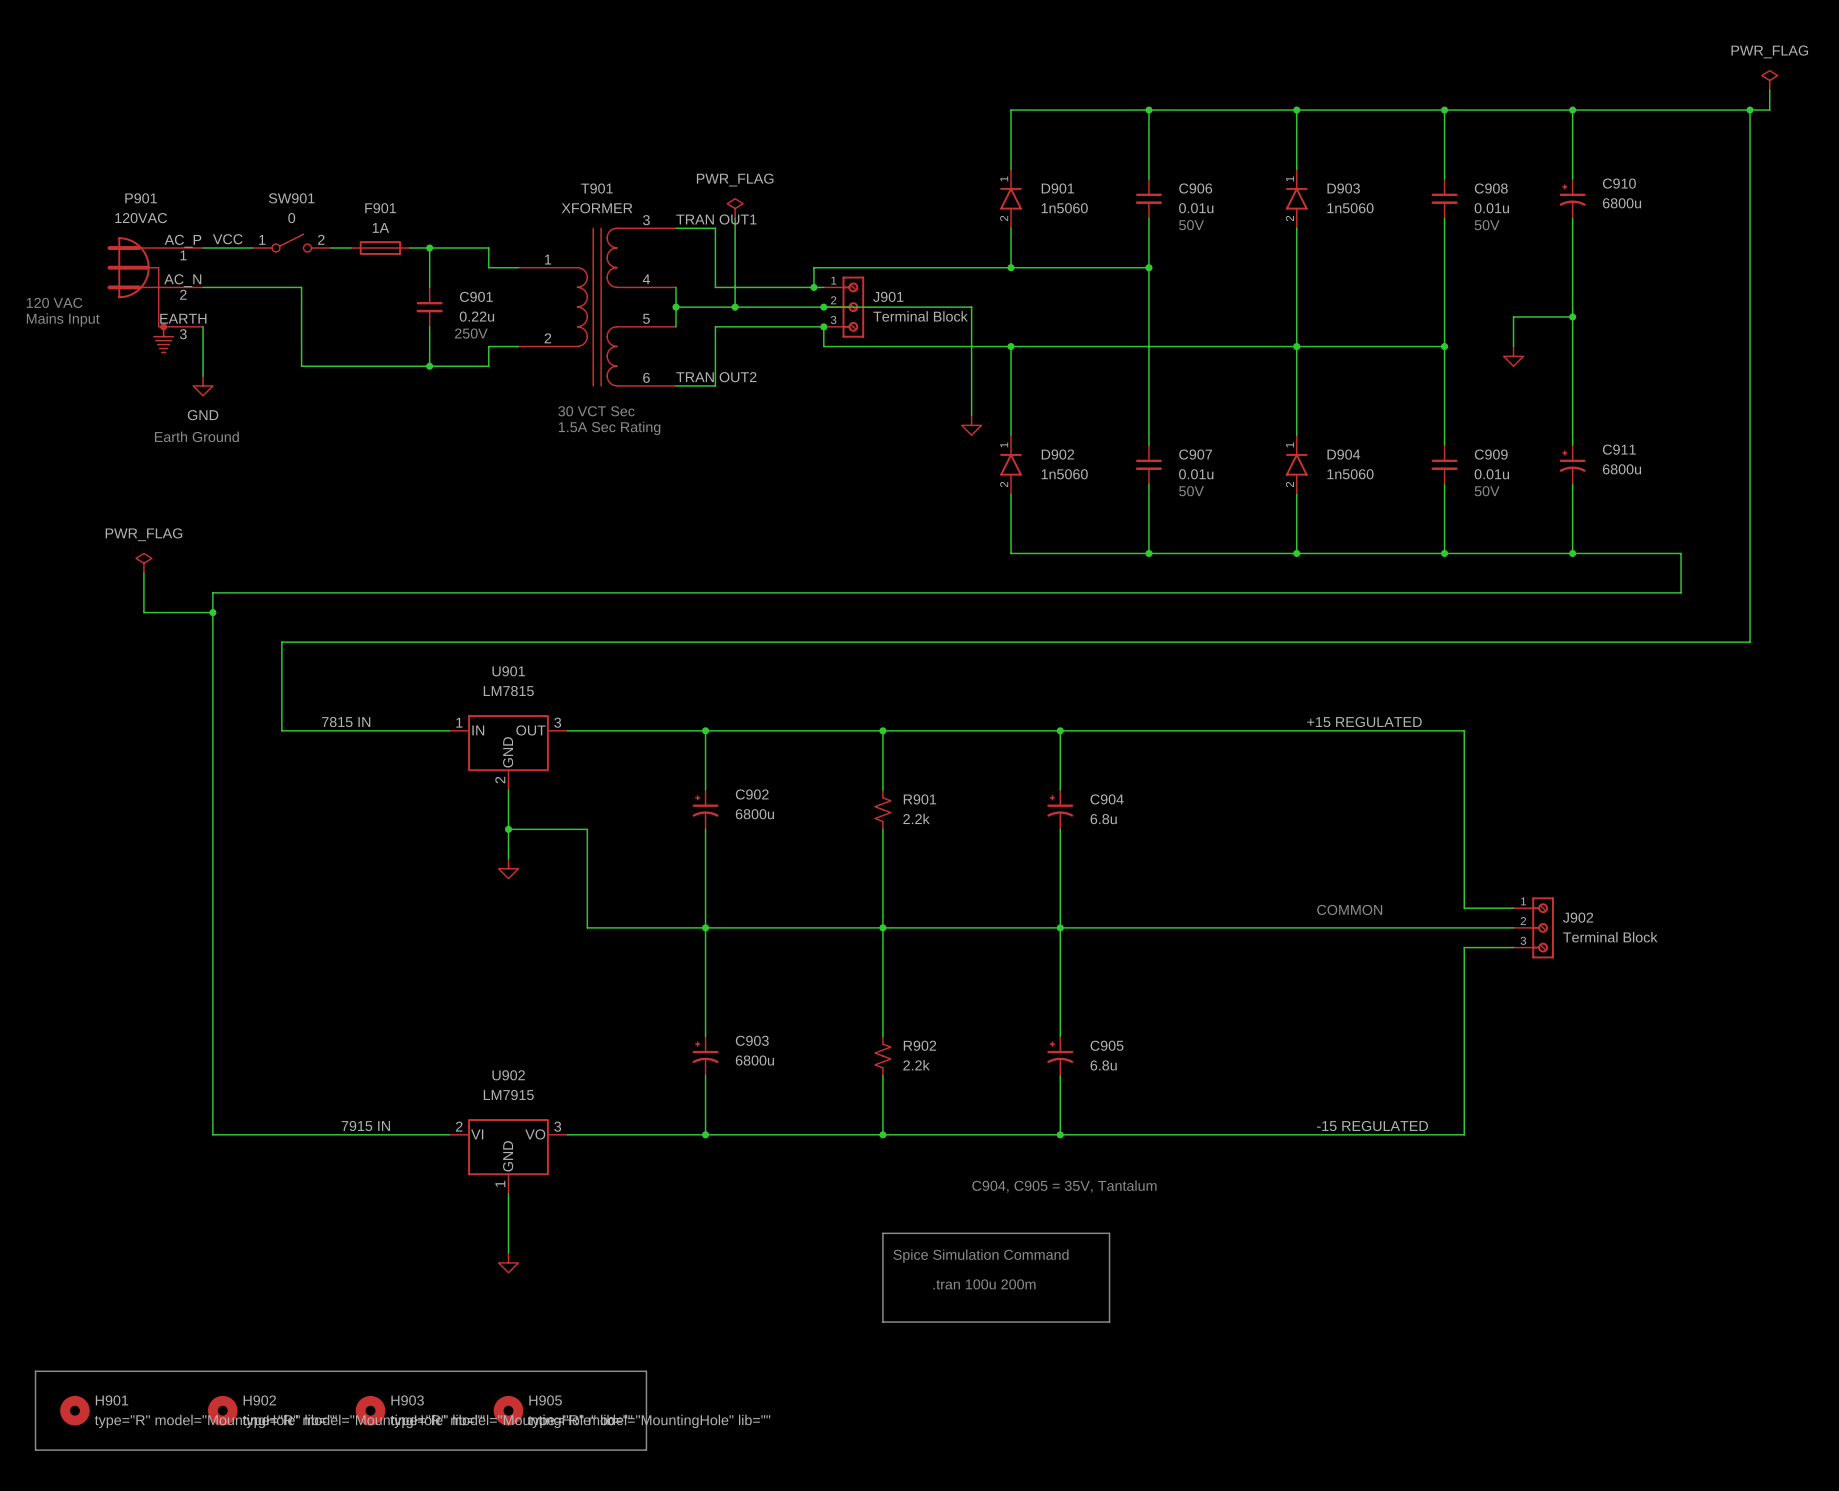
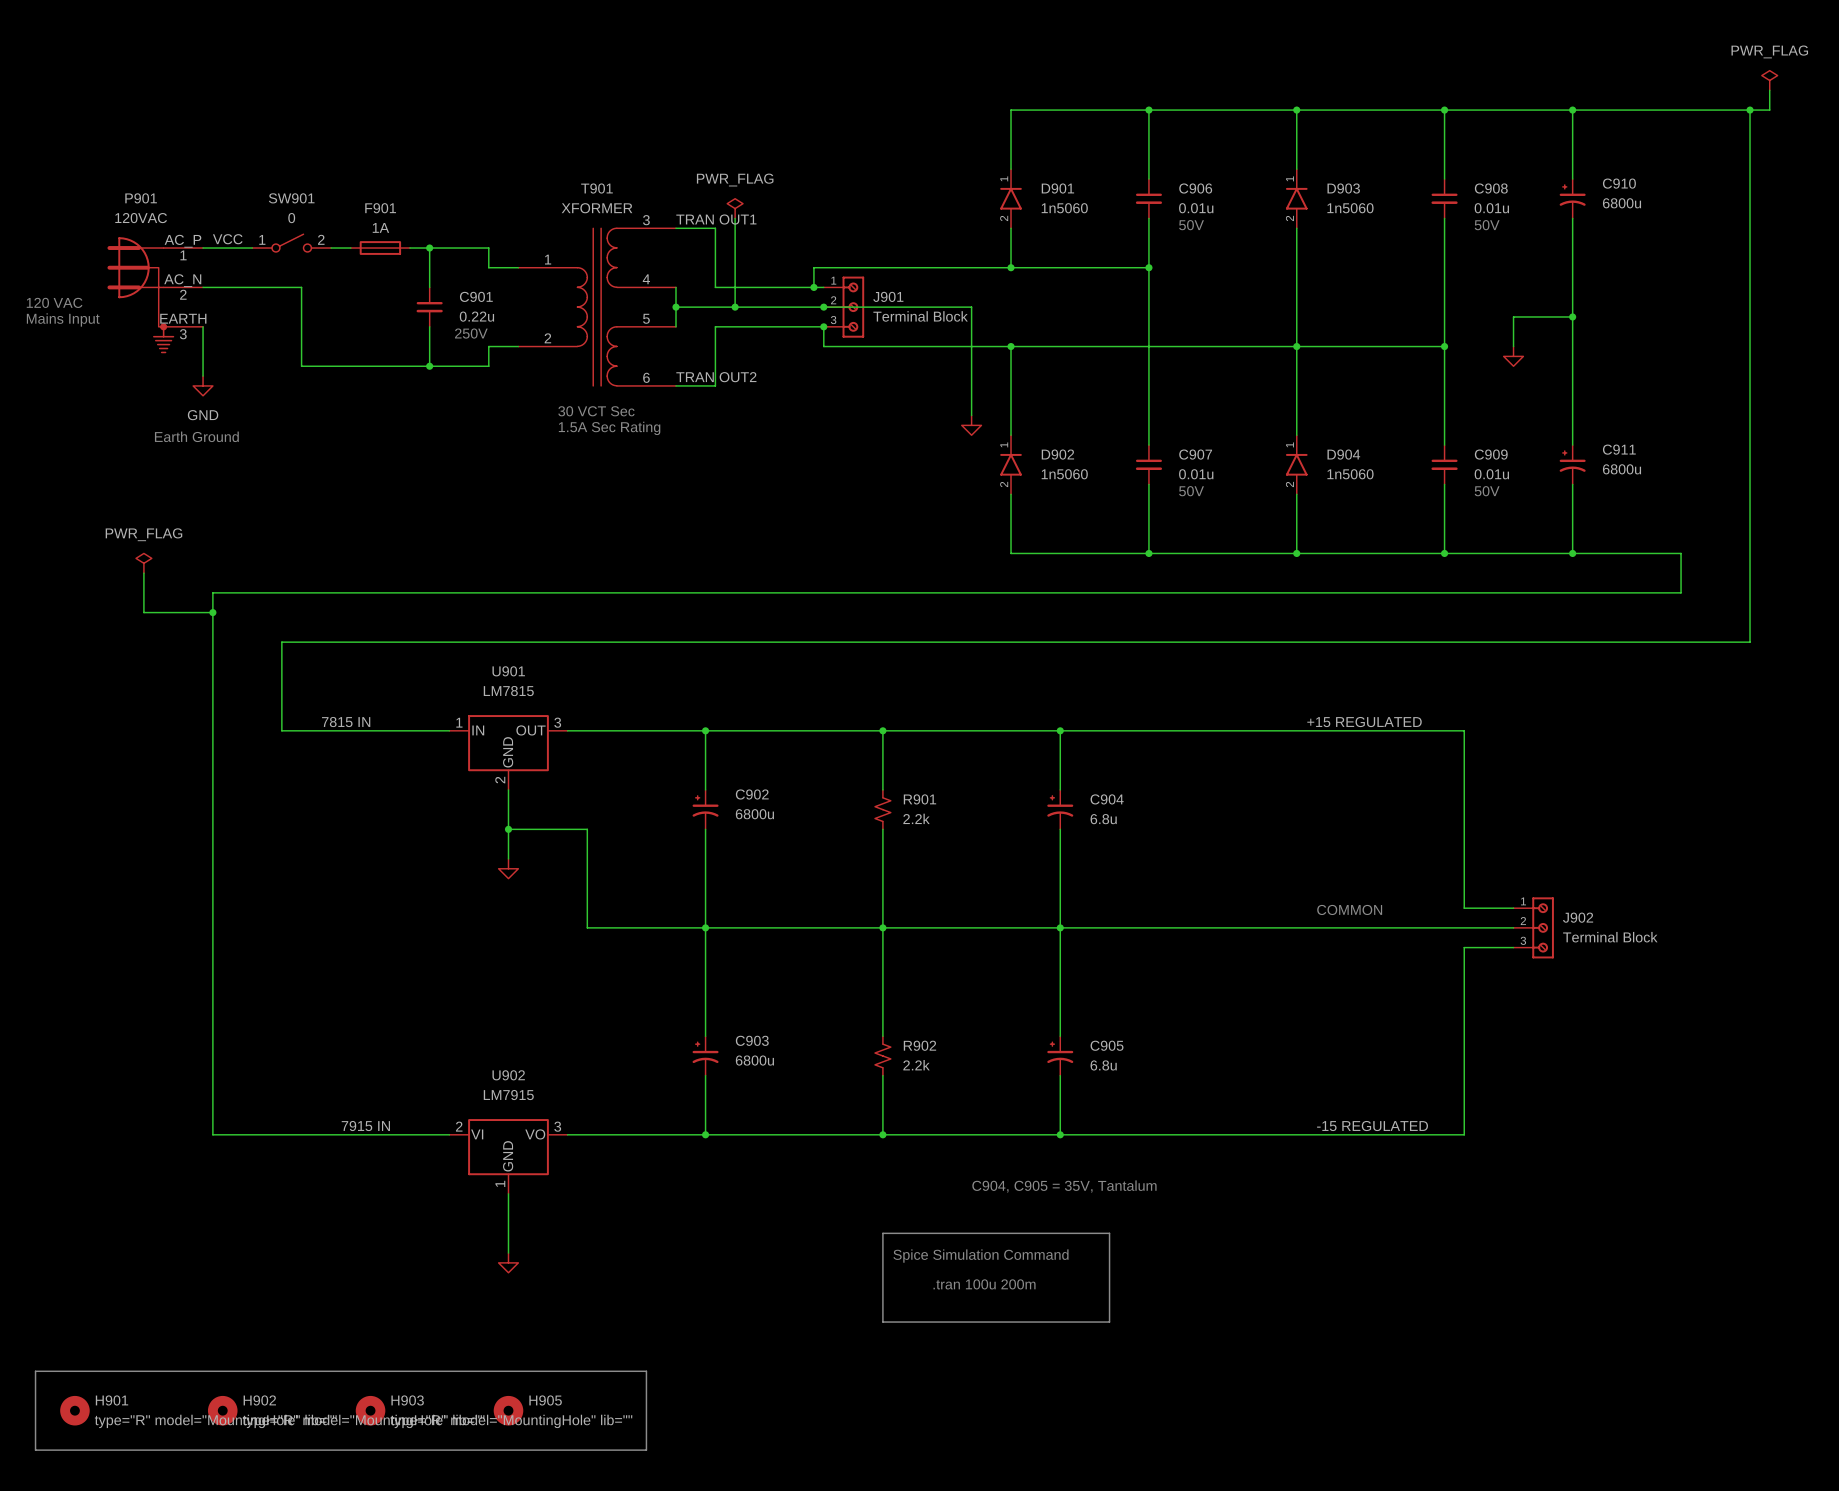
H905 value: type="R" model="MountingHole" lib="" (649, 1421) -> none

